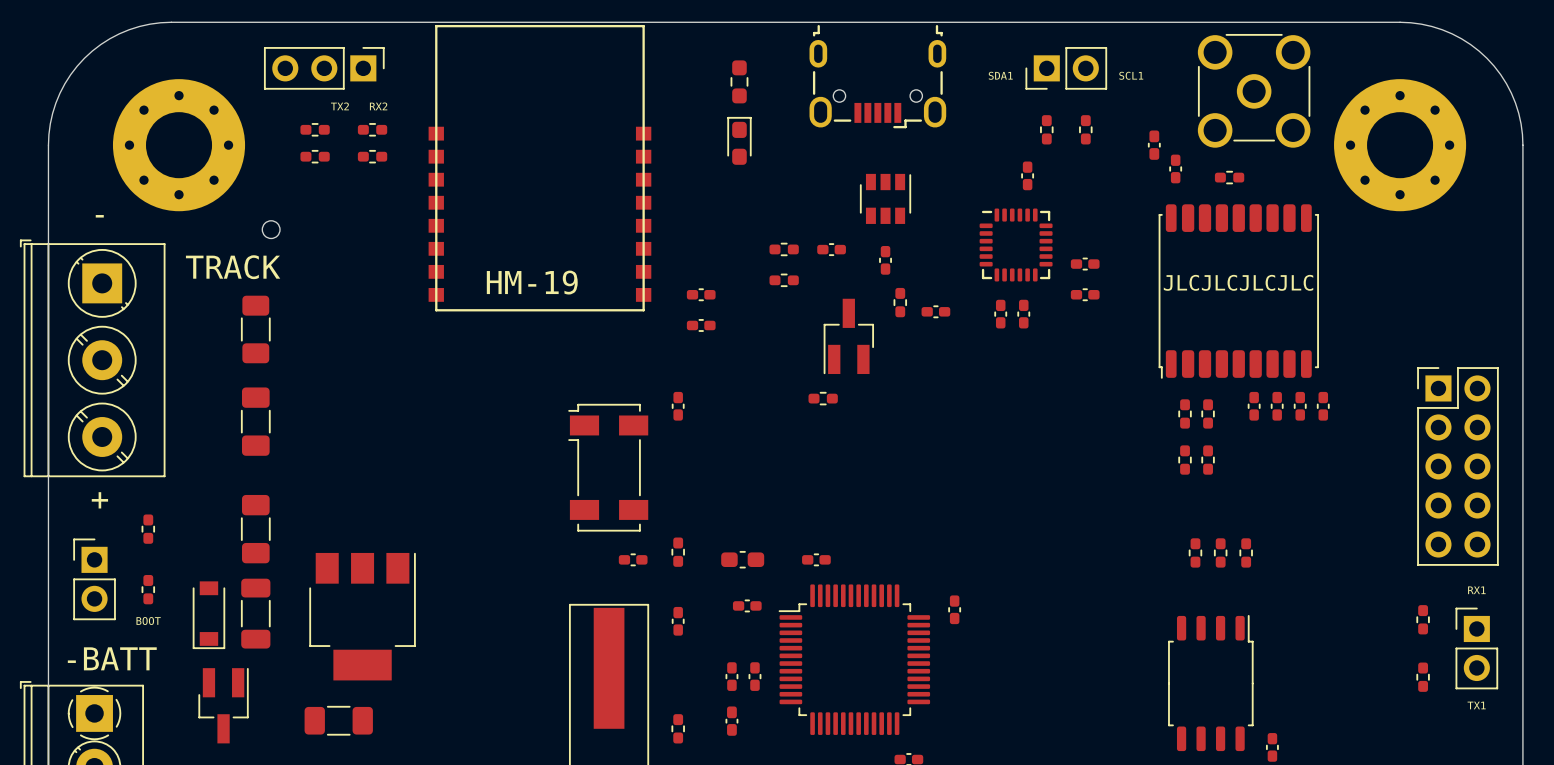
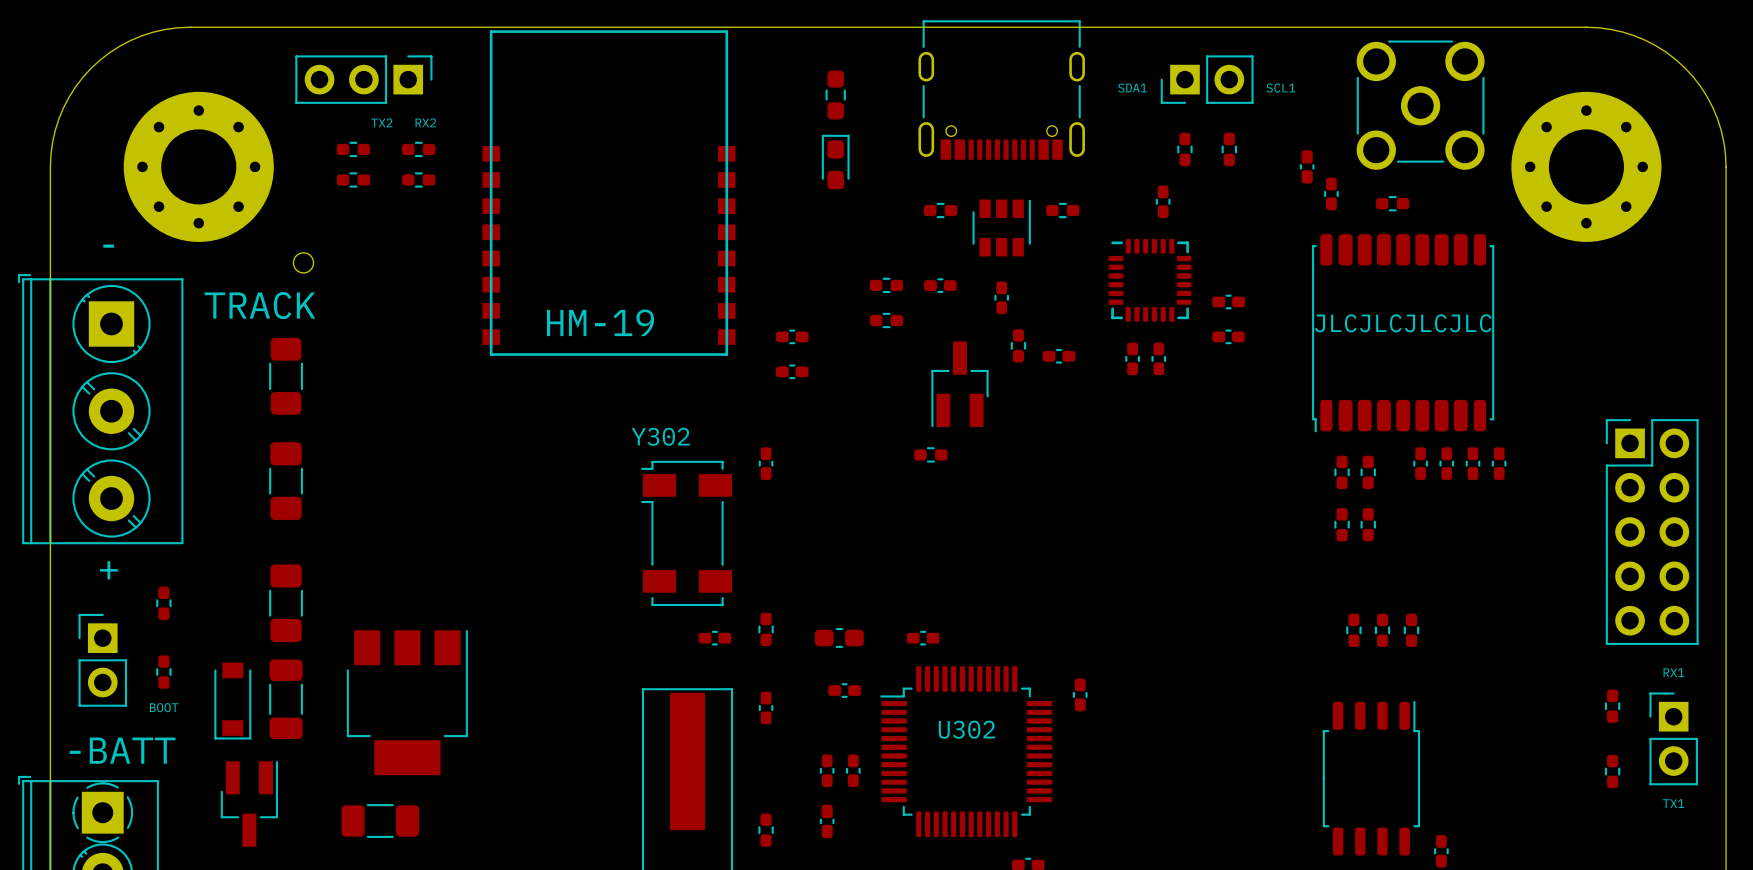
part footprint: [809, 24, 947, 129] -> [918, 20, 1085, 160]
part: none -> (940, 210)
part: none -> (1062, 210)
Y302 name: none -> Y302 (660, 436)
U302 name: none -> U302 (966, 729)

